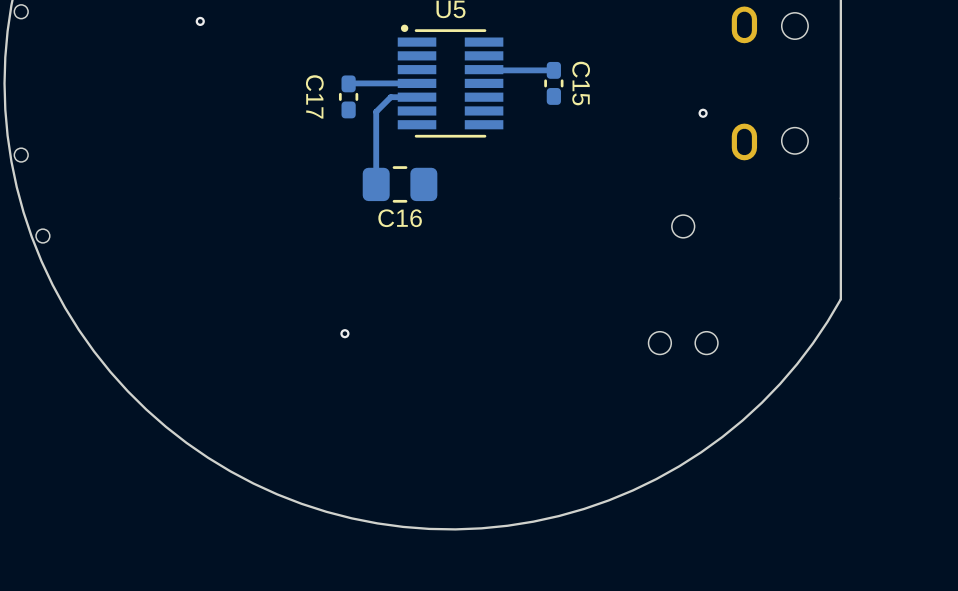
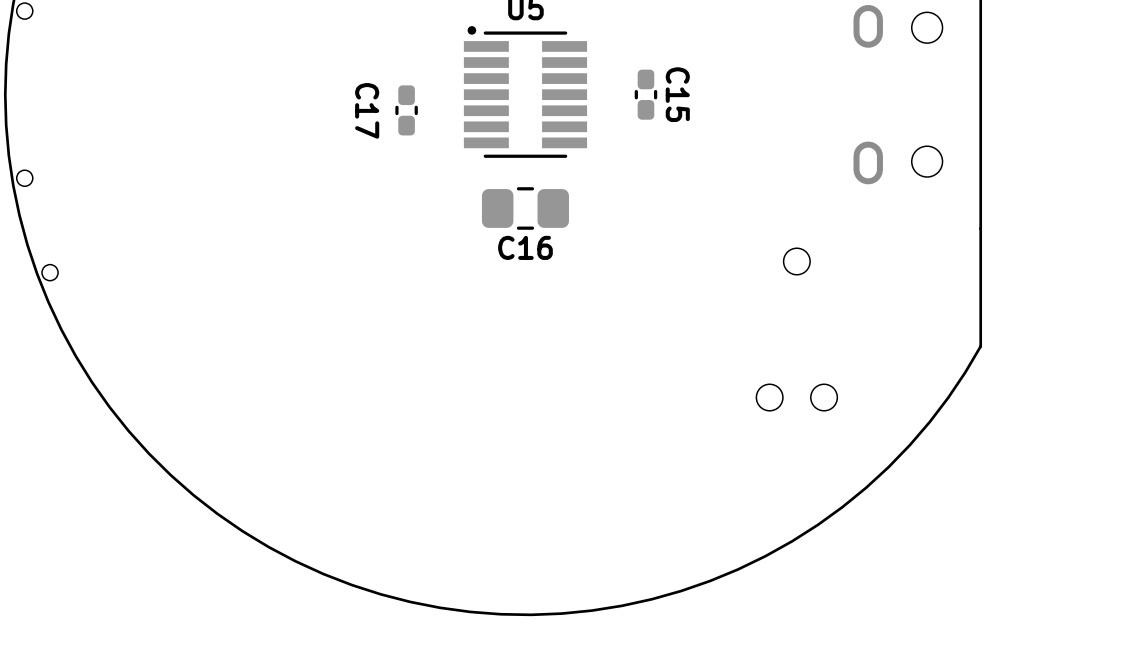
via: (200, 21) -> none
track: (484, 69) (553, 70) -> none
track: (417, 83) (348, 83) -> none
track: (417, 97) (390, 97) (376, 111) (376, 184) -> none
via: (703, 113) -> none
C16 position: (400, 184) -> (525, 208)
via: (344, 333) -> none

